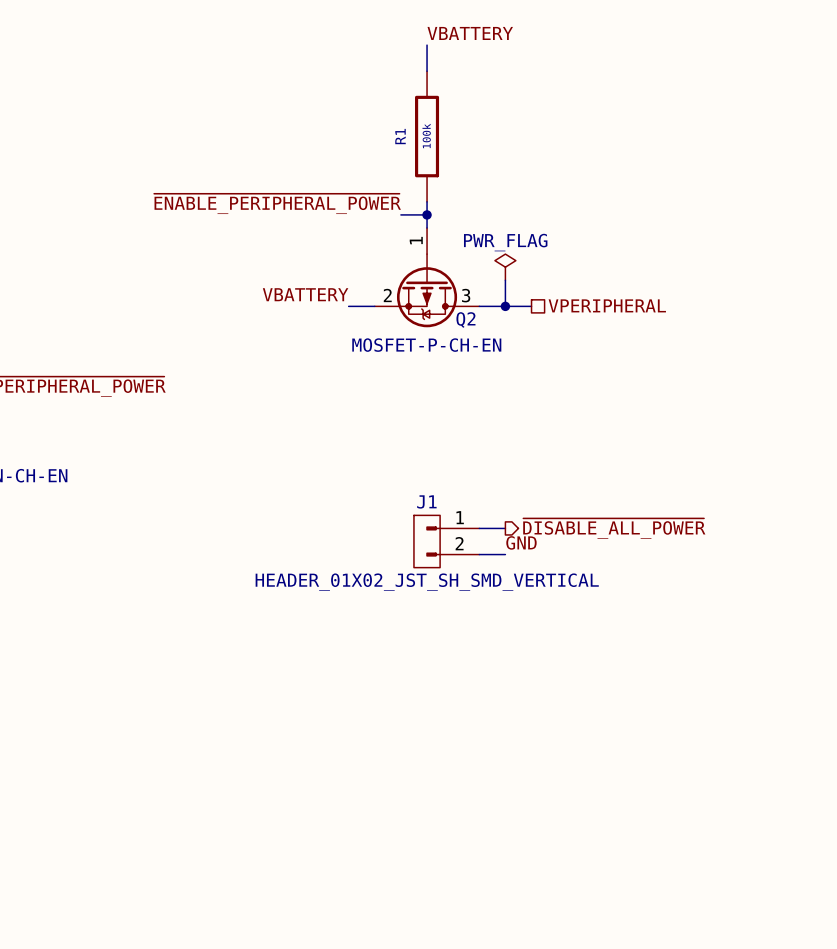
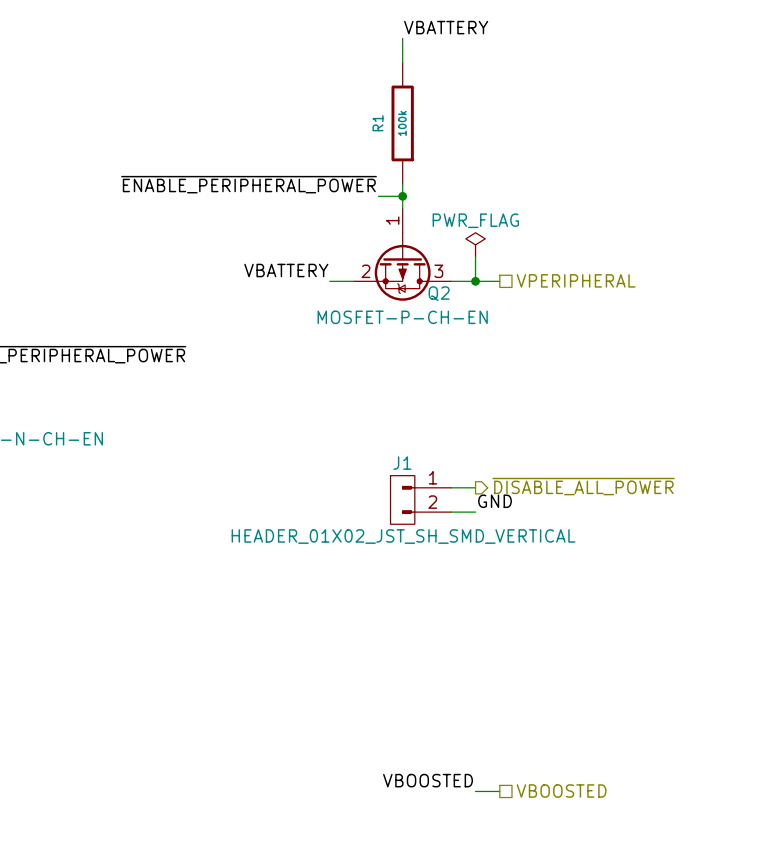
label: none -> VBOOSTED (428, 780)
hierarchical label: none -> VBOOSTED (561, 791)
wire: none -> (475, 791) (499, 791)

